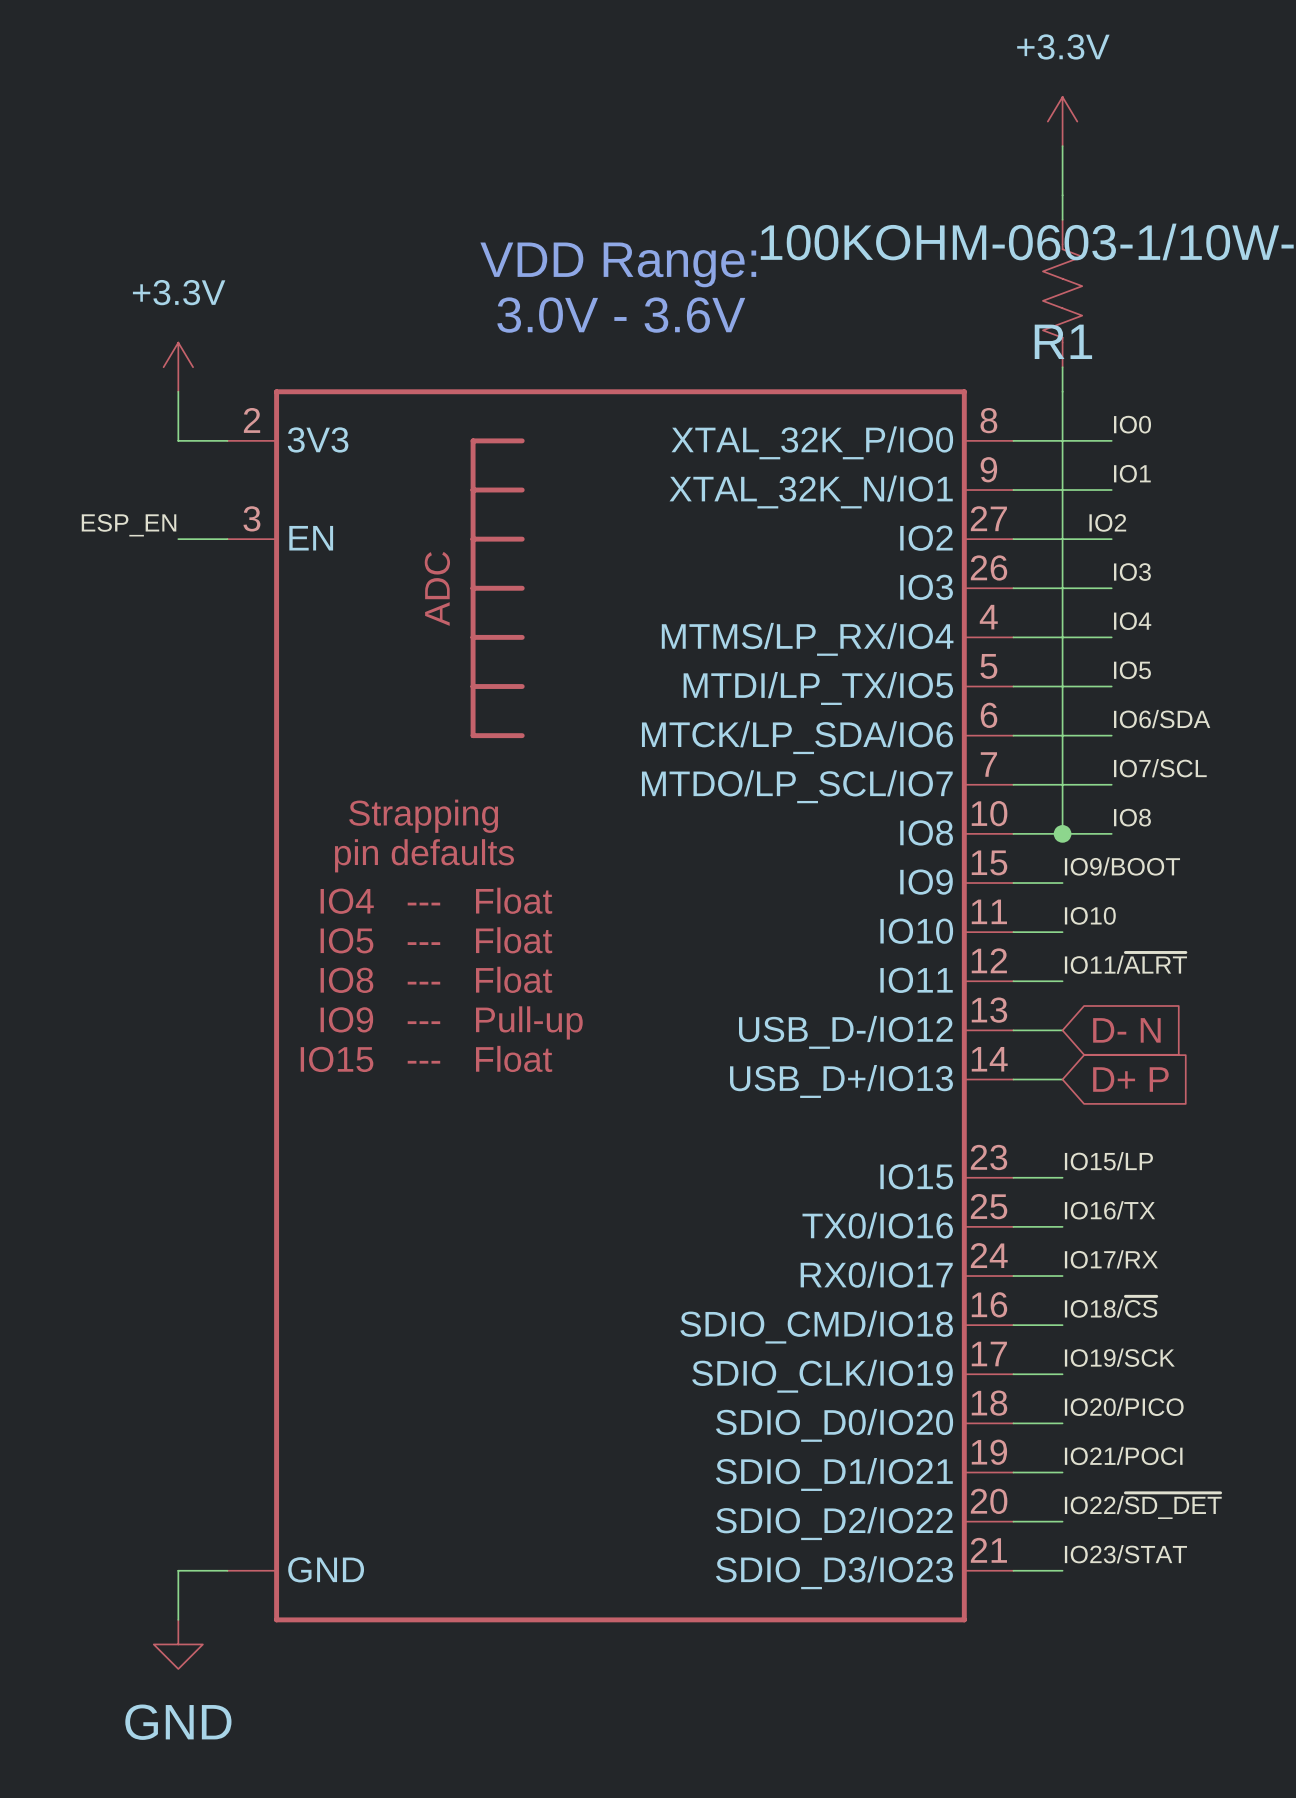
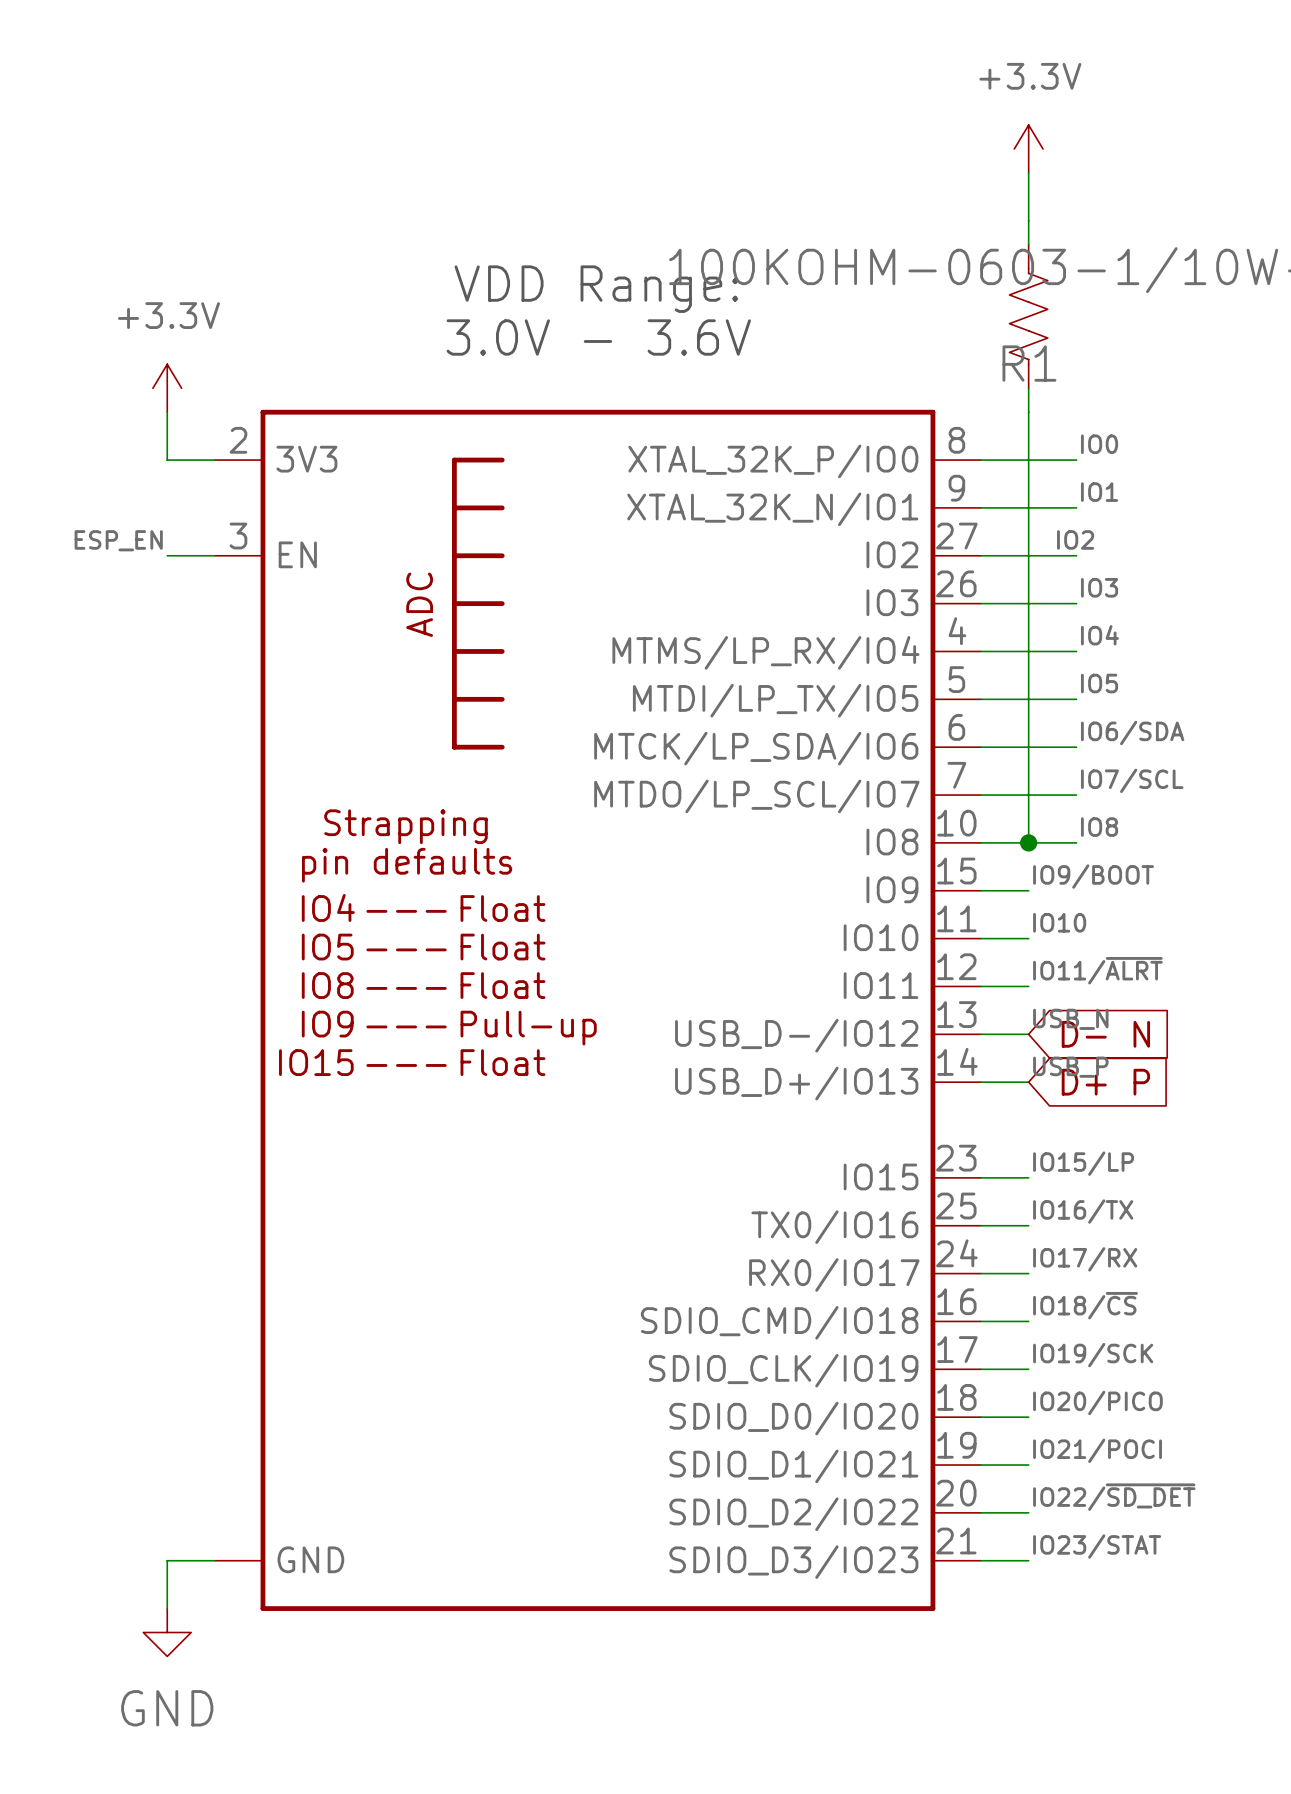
label: none -> USB_N (1070, 1019)
label: none -> USB_P (1070, 1067)

